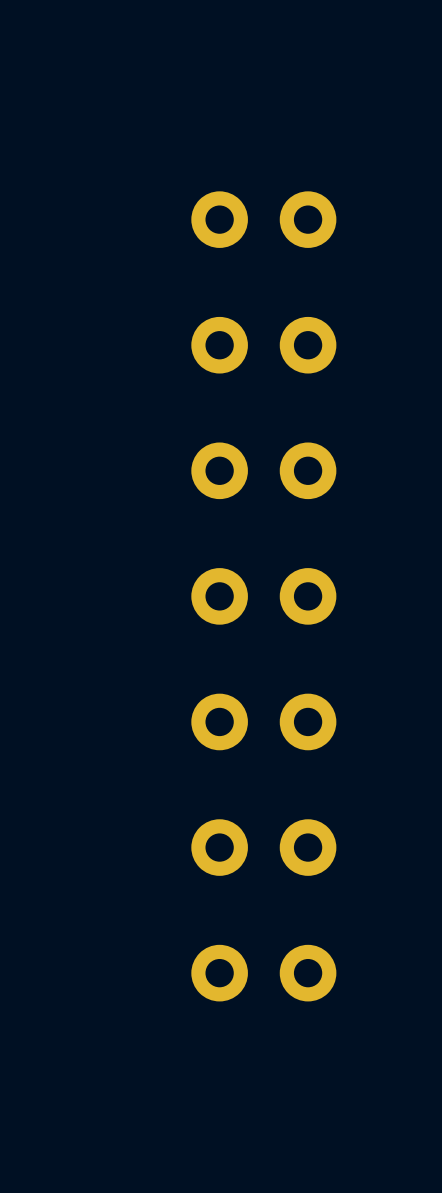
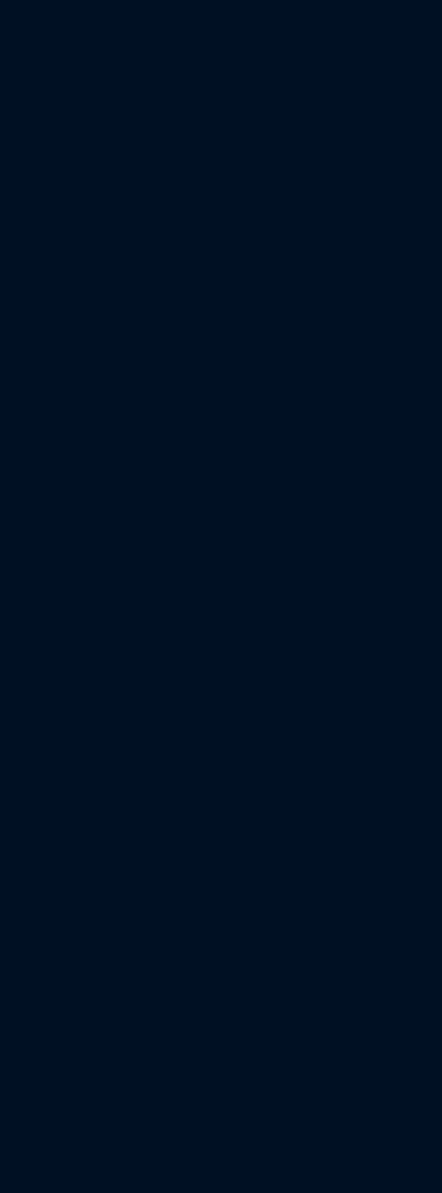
part: (263, 219) -> none
part: (263, 345) -> none
part: (263, 470) -> none
part: (263, 596) -> none
part: (263, 721) -> none
part: (263, 847) -> none
part: (263, 973) -> none

